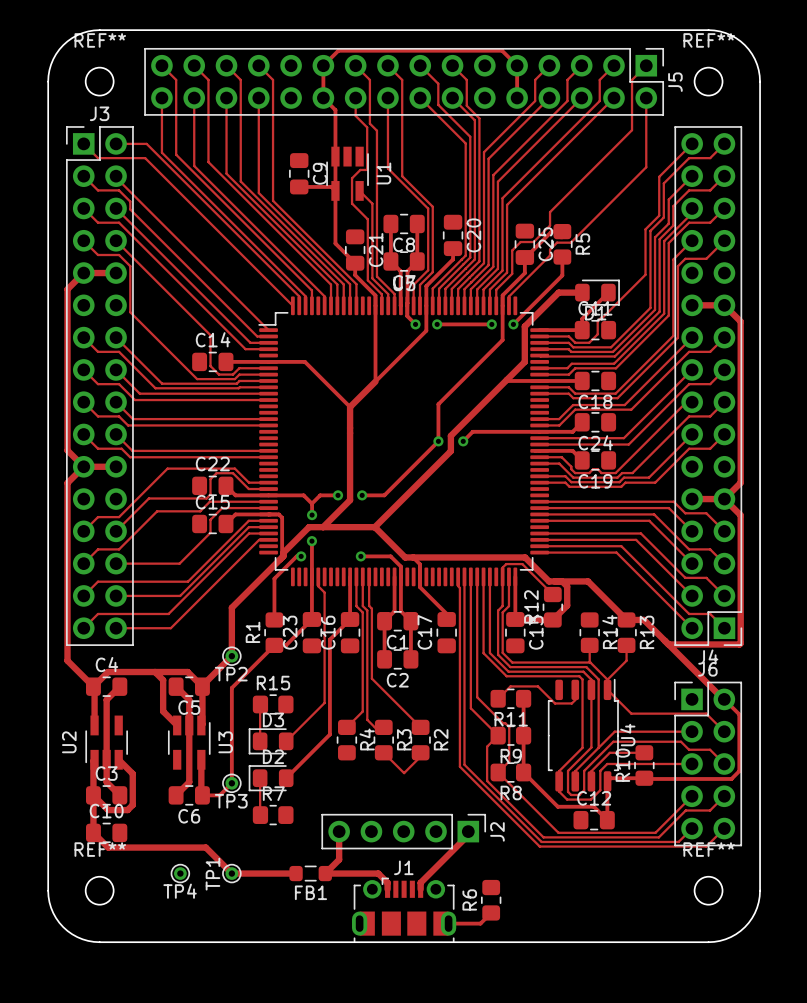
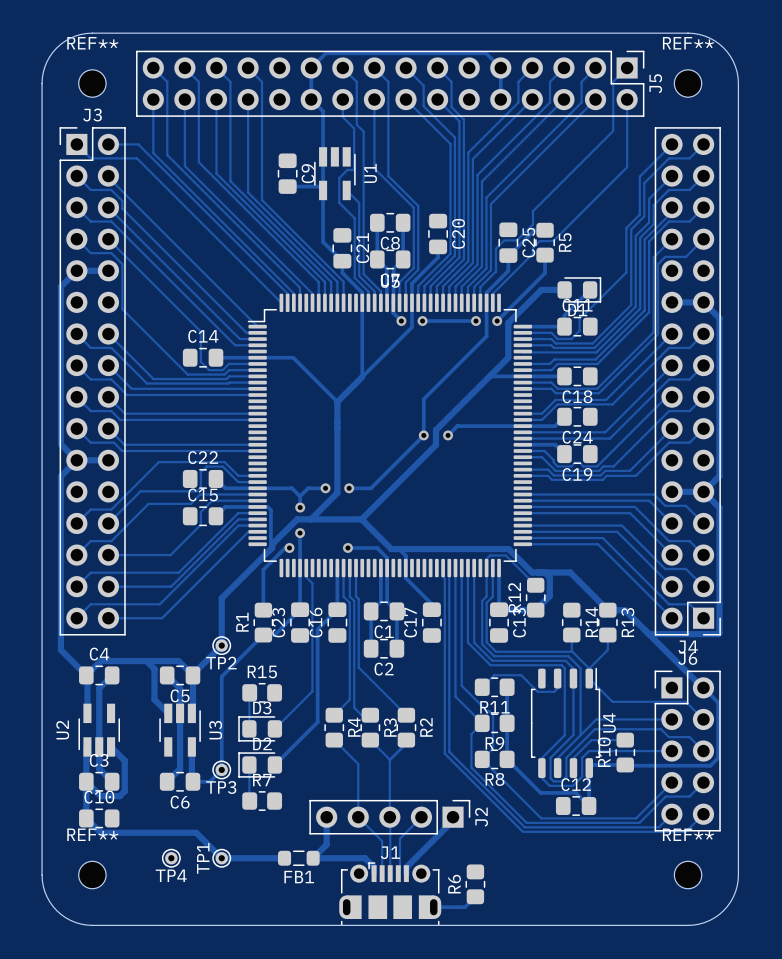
track: none -> (334, 740) (358, 764) (358, 817) (382, 841) (382, 873)
track: none -> (406, 743) (389, 759) (390, 873)
track: none -> (421, 817) (399, 838) (398, 873)

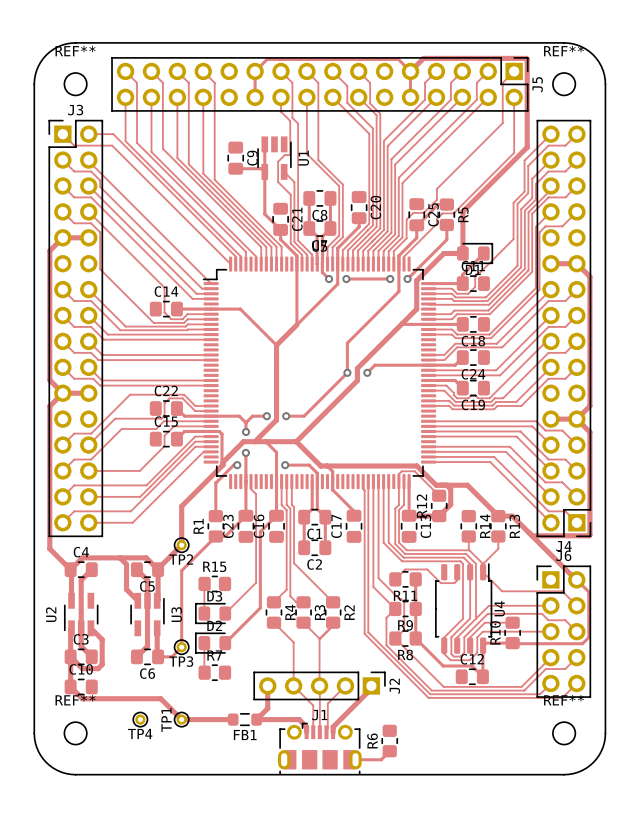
track: none -> (410, 71) (423, 58) (527, 59) (527, 147) (462, 211) (462, 253)
track: (311, 99) (323, 111) (323, 156) -> none
track: none -> (265, 441) (276, 452) (276, 481)

